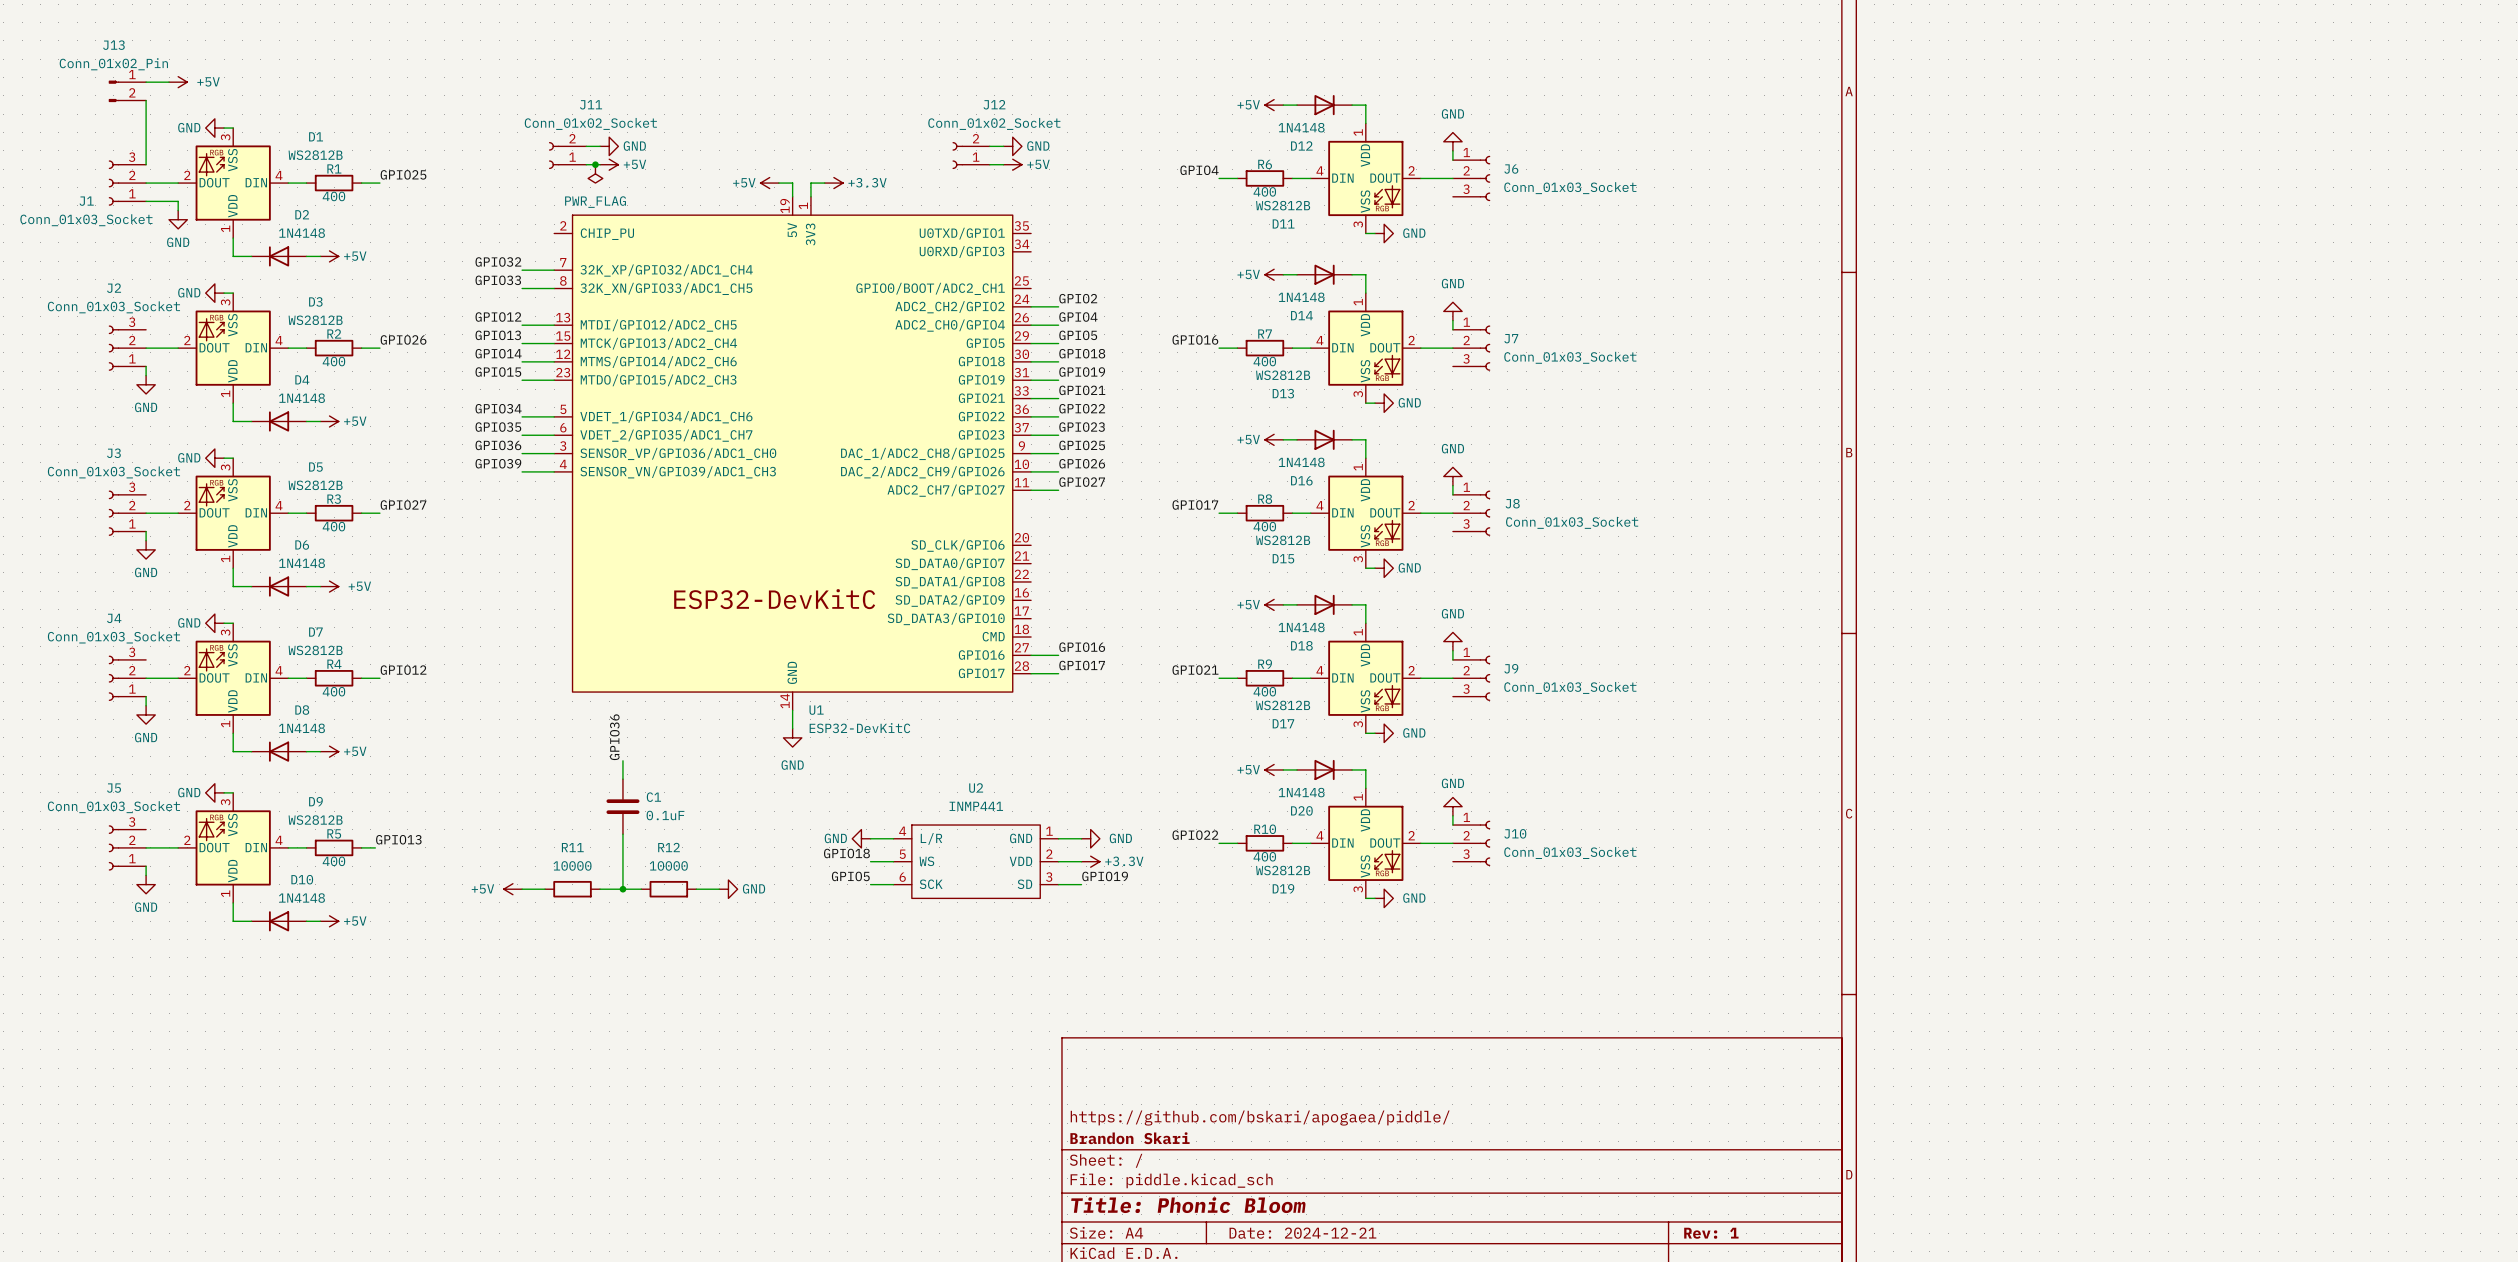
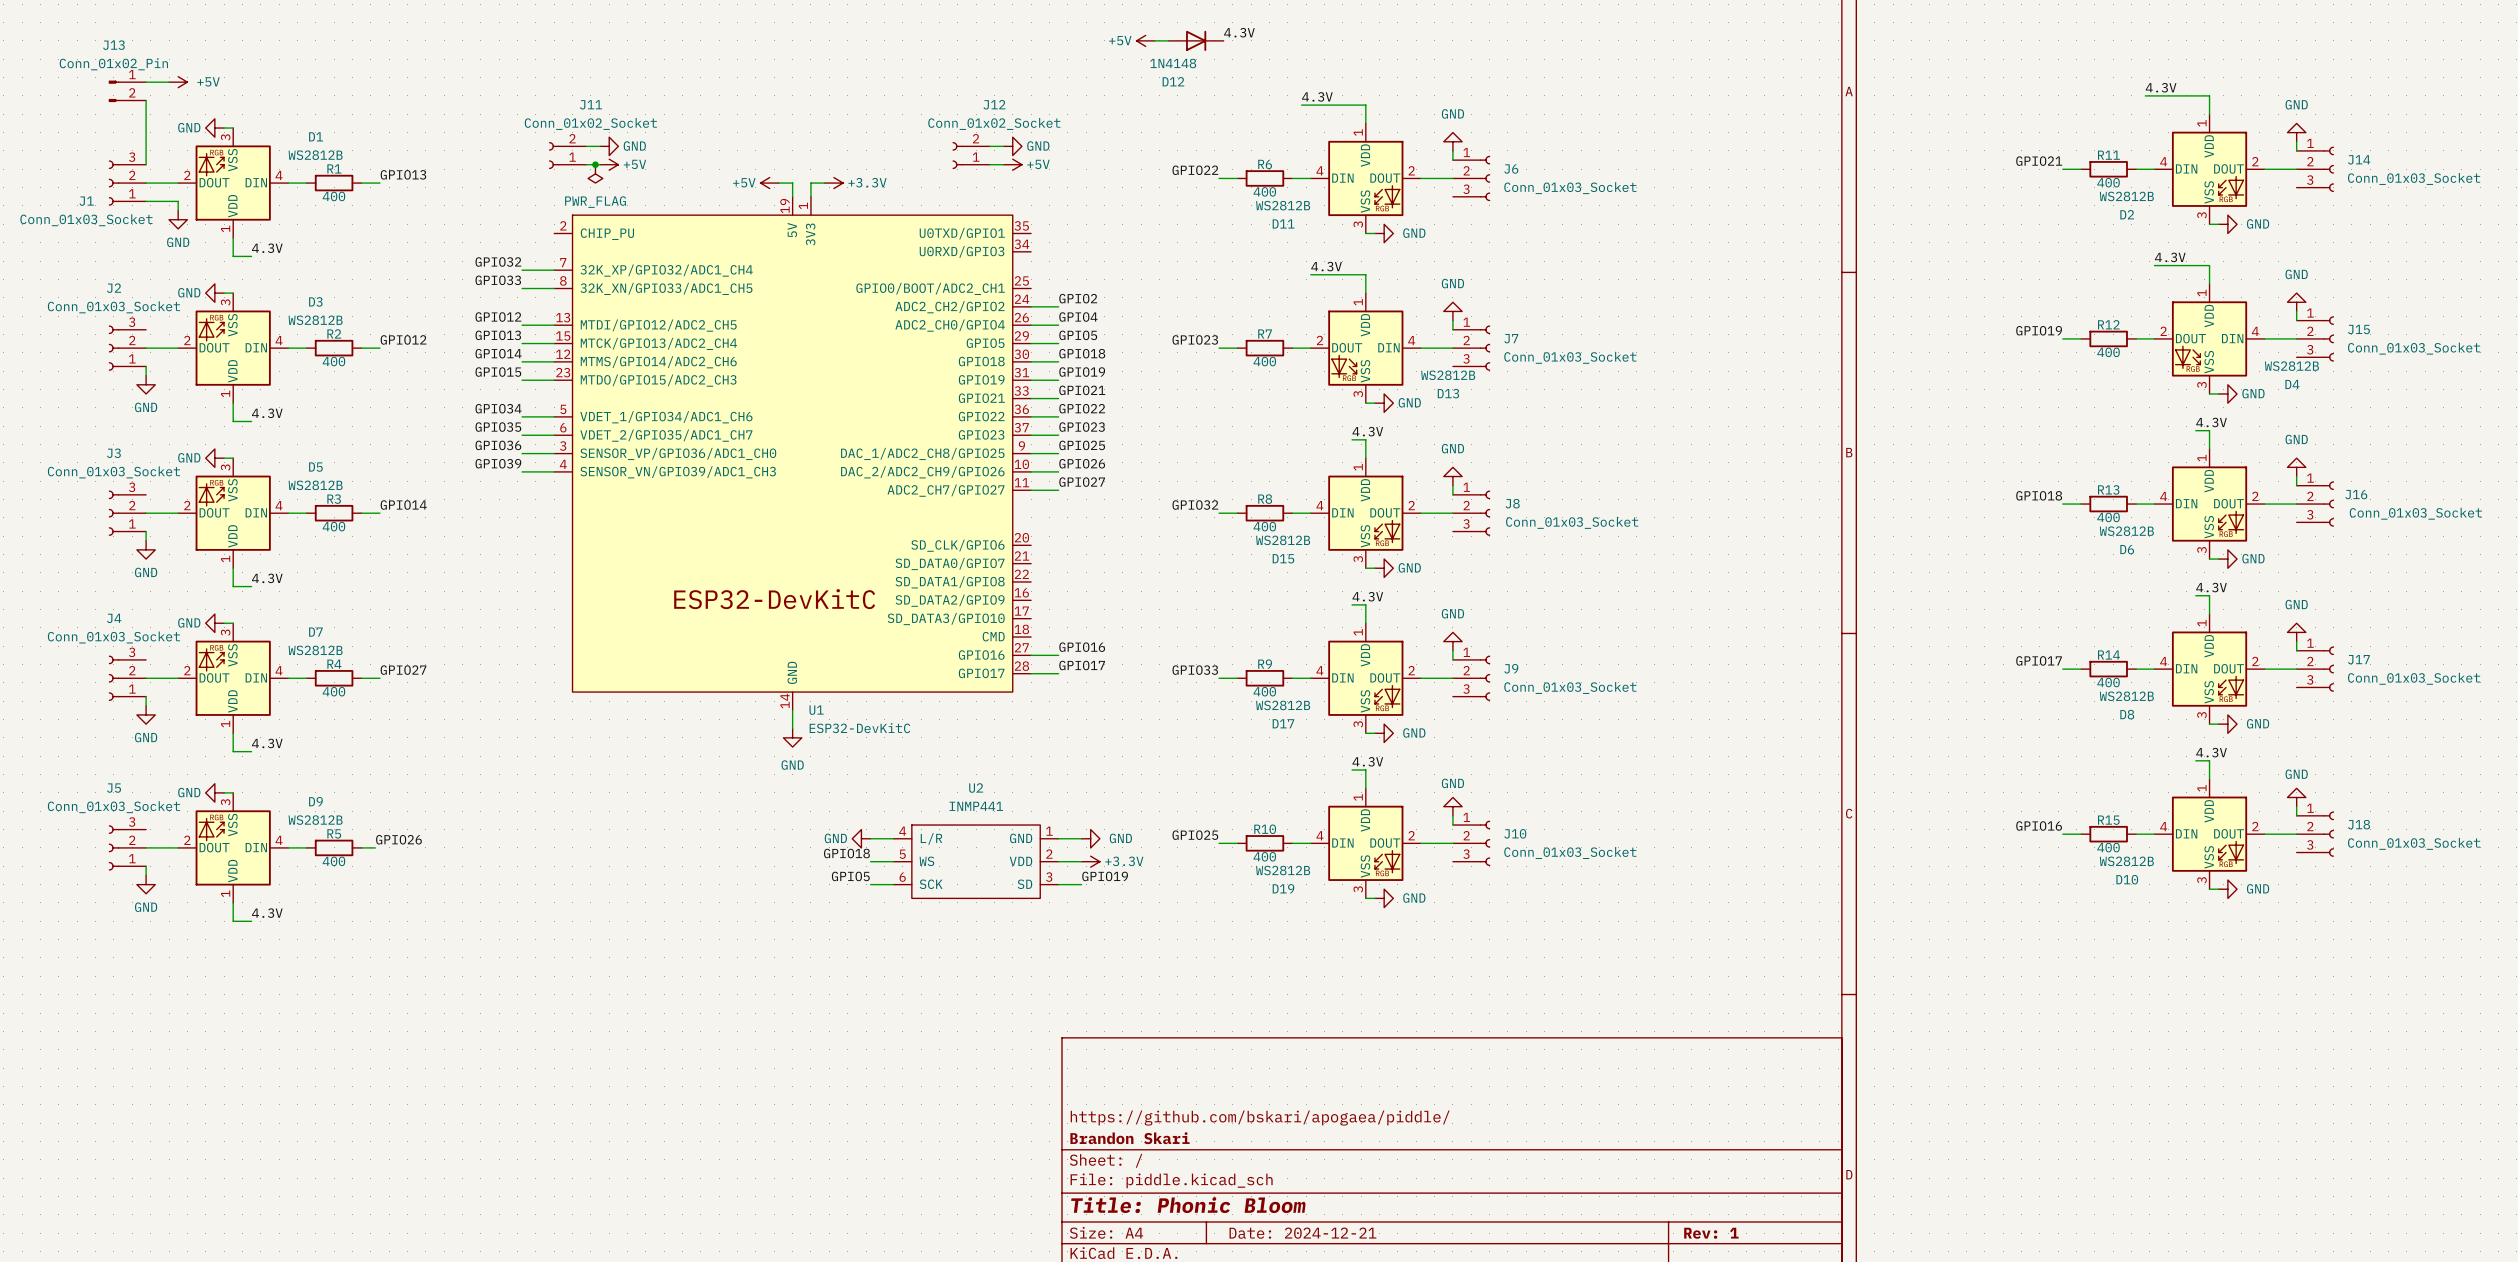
label: none -> 4.3V (1239, 32)
power symbol: none -> +5V (1145, 40)
label: none -> 4.3V (2161, 87)
wire: none -> (2145, 95) (2209, 95) (2209, 114)
label: none -> 4.3V (1317, 96)
power symbol: +5V (1274, 105) -> none
wire: (1283, 105) (1297, 105) -> (1154, 40) (1168, 40)
D12 position: (1324, 105) -> (1196, 40)
power symbol: none -> GND (2296, 132)
wire: none -> (2296, 141) (2296, 150)
label: none -> GPIO21 (2039, 161)
wire: none -> (2062, 169) (2081, 169)
wire: none -> (2136, 169) (2154, 169)
wire: none -> (2264, 169) (2296, 169)
J14: none -> Conn_01x03_Socket (2315, 169)
label: GPIO4 (1199, 170) -> GPIO22 (1195, 170)
label: GPIO25 (403, 174) -> GPIO13 (403, 174)
D2 name position: D2 (302, 214) -> D2 (2127, 214)
wire: none -> (2209, 224) (2218, 224)
power symbol: none -> GND (2227, 224)
D2 value: 1N4148 (301, 233) -> WS2812B (2126, 196)
D2 symbol: [251, 246, 307, 267] -> [2154, 114, 2265, 225]
label: none -> 4.3V (267, 248)
wire: (306, 256) (320, 256) -> none
power symbol: +5V (329, 256) -> none
label: none -> 4.3V (2170, 257)
wire: none -> (2154, 265) (2209, 265) (2209, 283)
label: none -> 4.3V (1326, 266)
power symbol: +5V (1274, 274) -> none
wire: (1283, 274) (1297, 274) -> none
D14: 1N4148 (1324, 274) -> none
power symbol: none -> GND (2296, 302)
wire: none -> (2296, 311) (2296, 320)
label: none -> GPIO19 (2039, 330)
wire: none -> (2062, 338) (2081, 338)
wire: none -> (2136, 338) (2154, 338)
wire: none -> (2264, 338) (2296, 338)
J15: none -> Conn_01x03_Socket (2315, 338)
label: GPIO26 (403, 339) -> GPIO12 (403, 339)
label: GPIO16 (1195, 339) -> GPIO23 (1195, 339)
D13 flip: as is (1365, 348) -> left-right (1365, 348)
D4 name position: D4 (302, 379) -> D4 (2292, 384)
wire: none -> (2209, 393) (2218, 393)
power symbol: none -> GND (2227, 393)
D4 value: 1N4148 (301, 398) -> WS2812B (2291, 366)
D4 symbol: [251, 411, 307, 432] -> [2154, 283, 2265, 394]
label: none -> 4.3V (267, 413)
wire: (306, 421) (320, 421) -> none
power symbol: +5V (329, 421) -> none
label: none -> 4.3V (2211, 422)
wire: none -> (2195, 430) (2209, 430) (2209, 449)
label: none -> 4.3V (1367, 431)
power symbol: +5V (1274, 439) -> none
wire: (1283, 439) (1297, 439) -> none
D16: 1N4148 (1324, 439) -> none
power symbol: none -> GND (2296, 467)
wire: none -> (2296, 476) (2296, 485)
label: none -> GPIO18 (2039, 495)
wire: none -> (2062, 504) (2081, 504)
R13: none -> 400 (2108, 504)
wire: none -> (2136, 504) (2154, 504)
wire: none -> (2264, 504) (2296, 504)
J16: none -> Conn_01x03_Socket (2315, 504)
label: GPIO27 (403, 505) -> GPIO14 (403, 505)
label: GPIO17 (1195, 505) -> GPIO32 (1195, 505)
D6 name position: D6 (302, 545) -> D6 (2127, 549)
wire: none -> (2209, 559) (2218, 559)
power symbol: none -> GND (2227, 559)
D6 value: 1N4148 (301, 563) -> WS2812B (2126, 531)
D6 symbol: [251, 576, 307, 597] -> [2154, 449, 2265, 560]
label: none -> 4.3V (267, 578)
wire: (306, 586) (320, 586) -> none
power symbol: +5V (329, 586) -> none
label: none -> 4.3V (2211, 587)
wire: none -> (2195, 595) (2209, 595) (2209, 614)
label: none -> 4.3V (1367, 596)
power symbol: +5V (1274, 604) -> none
wire: (1283, 604) (1297, 604) -> none
D18: 1N4148 (1324, 604) -> none
power symbol: none -> GND (2296, 632)
wire: none -> (2296, 641) (2296, 650)
label: none -> GPIO17 (2039, 660)
wire: none -> (2062, 669) (2081, 669)
R14: none -> 400 (2108, 669)
wire: none -> (2136, 669) (2154, 669)
wire: none -> (2264, 669) (2296, 669)
J17: none -> Conn_01x03_Socket (2315, 669)
label: GPIO12 (403, 670) -> GPIO27 (403, 670)
label: GPIO21 (1195, 670) -> GPIO33 (1195, 670)
D8 name position: D8 (302, 710) -> D8 (2127, 714)
wire: none -> (2209, 724) (2218, 724)
power symbol: none -> GND (2227, 724)
D8 value: 1N4148 (301, 728) -> WS2812B (2126, 696)
label: GPIO36 (614, 737) -> none
D8 symbol: [251, 741, 307, 762] -> [2154, 614, 2265, 725]
label: none -> 4.3V (267, 743)
wire: (306, 751) (320, 751) -> none
power symbol: +5V (329, 751) -> none
label: none -> 4.3V (2211, 752)
wire: (622, 760) (622, 779) -> none
wire: none -> (2195, 760) (2209, 760) (2209, 779)
label: none -> 4.3V (1367, 761)
power symbol: +5V (1274, 769) -> none
wire: (1283, 769) (1297, 769) -> none
D20: 1N4148 (1324, 769) -> none
power symbol: none -> GND (2296, 797)
C1: 0.1uF (622, 806) -> none
wire: none -> (2296, 806) (2296, 815)
label: none -> GPIO16 (2039, 826)
wire: (622, 834) (622, 889) -> none
wire: none -> (2062, 834) (2081, 834)
R15: none -> 400 (2108, 834)
wire: none -> (2136, 834) (2154, 834)
wire: none -> (2264, 834) (2296, 834)
J18: none -> Conn_01x03_Socket (2315, 834)
label: GPIO22 (1195, 835) -> GPIO25 (1195, 835)
label: GPIO13 (398, 839) -> GPIO26 (398, 839)
R11 name position: R11 (572, 847) -> R11 (2108, 155)
R12 name position: R12 (669, 847) -> R12 (2108, 324)
R11 value: 10000 (572, 865) -> 400 (2108, 182)
R12 value: 10000 (668, 865) -> 400 (2108, 352)
D10 name position: D10 (302, 879) -> D10 (2127, 879)
power symbol: +5V (512, 889) -> none
wire: (522, 889) (545, 889) -> none
R11 position: (572, 889) -> (2108, 169)
wire: (600, 889) (641, 889) -> none
junction: (622, 889) -> none
R12 position: (668, 889) -> (2108, 338)
wire: (696, 889) (719, 889) -> none
power symbol: GND (728, 889) -> none
wire: none -> (2209, 889) (2218, 889)
power symbol: none -> GND (2227, 889)
D10 value: 1N4148 (301, 898) -> WS2812B (2126, 861)
D10 symbol: [251, 911, 307, 932] -> [2154, 779, 2265, 890]
label: none -> 4.3V (267, 913)
wire: (306, 921) (320, 921) -> none
power symbol: +5V (329, 921) -> none

